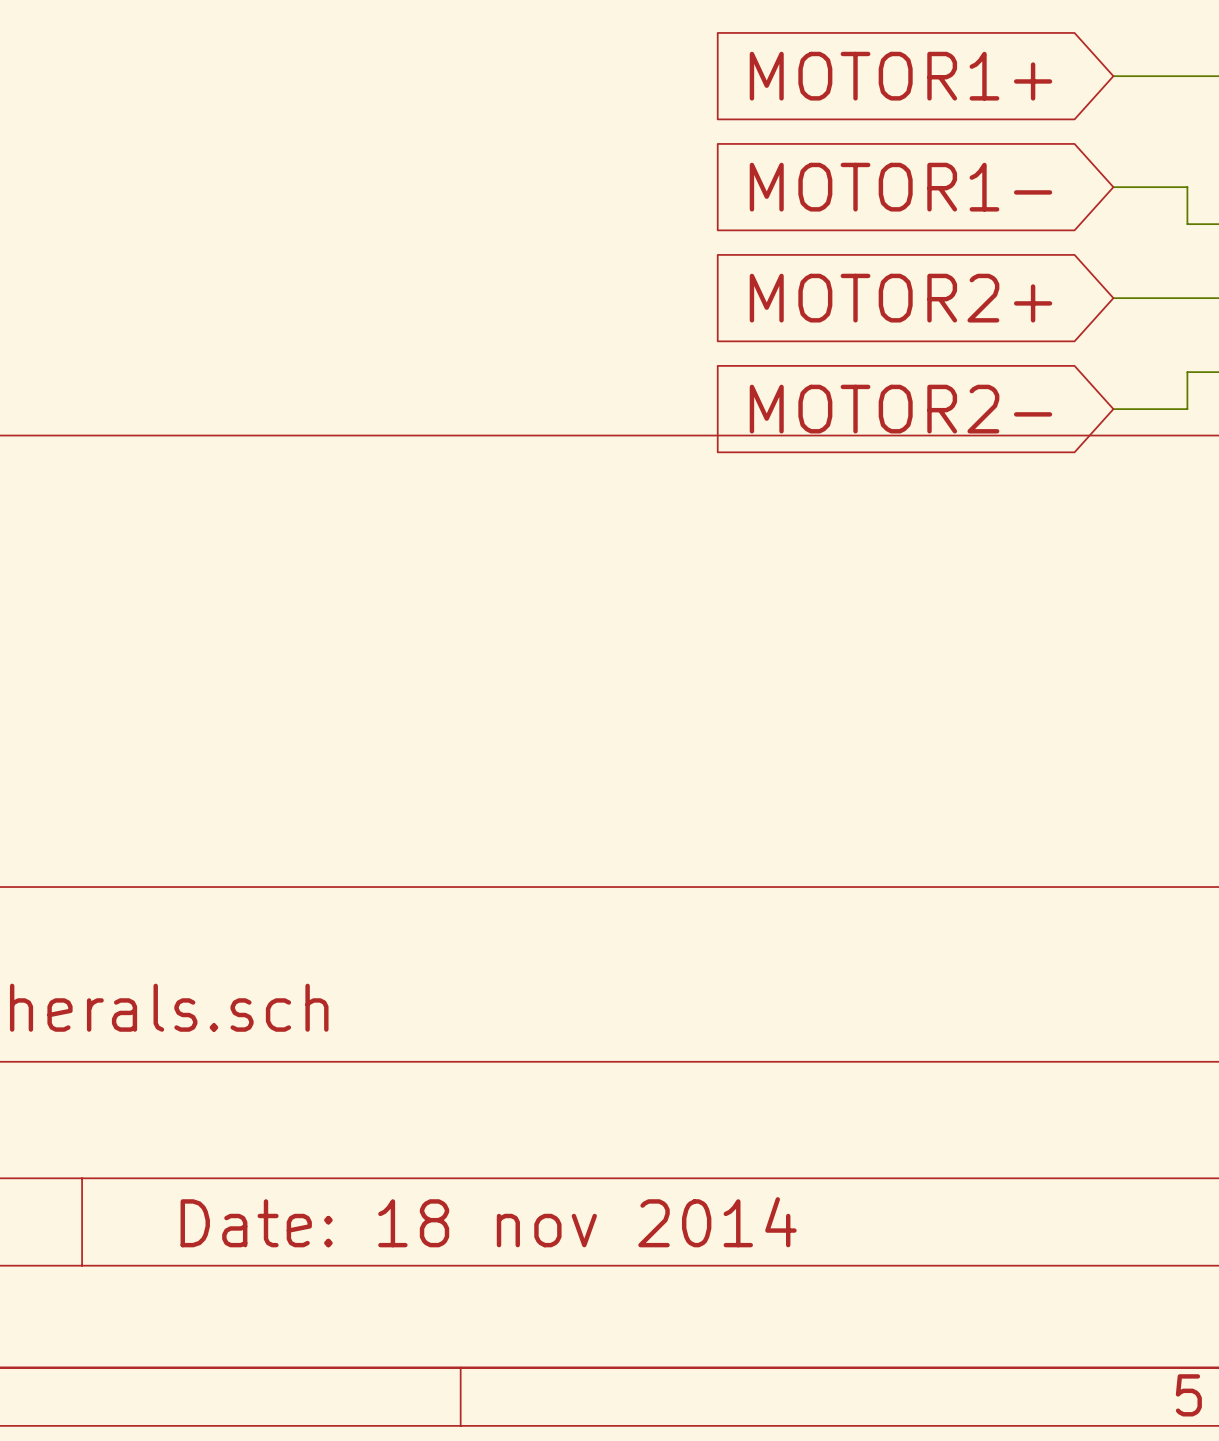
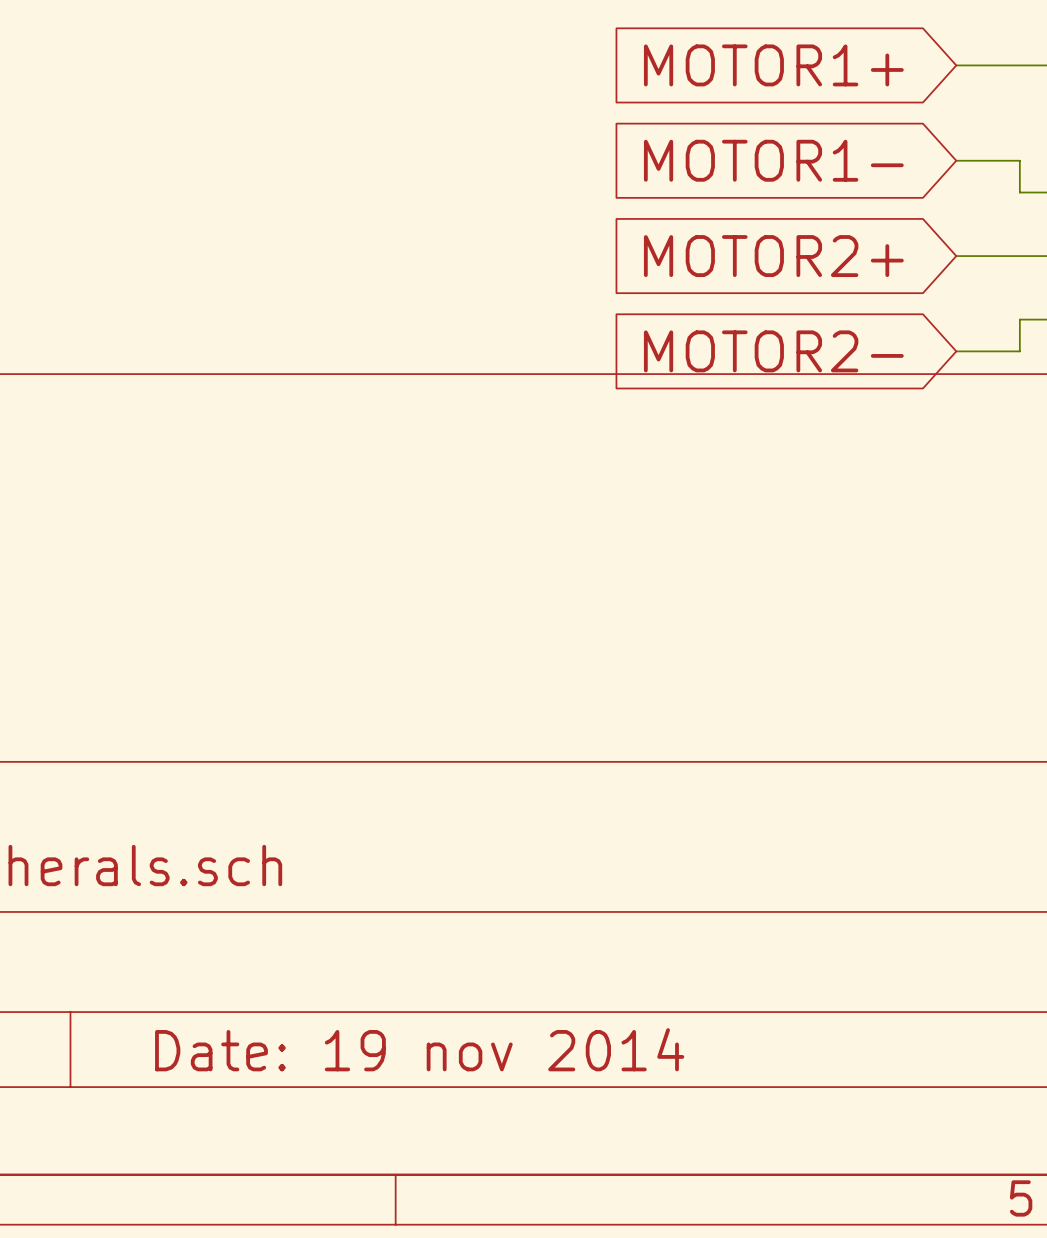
title block: Date: 18 nov 2014 (488, 1222) -> Date: 19 nov 2014 (419, 1049)

